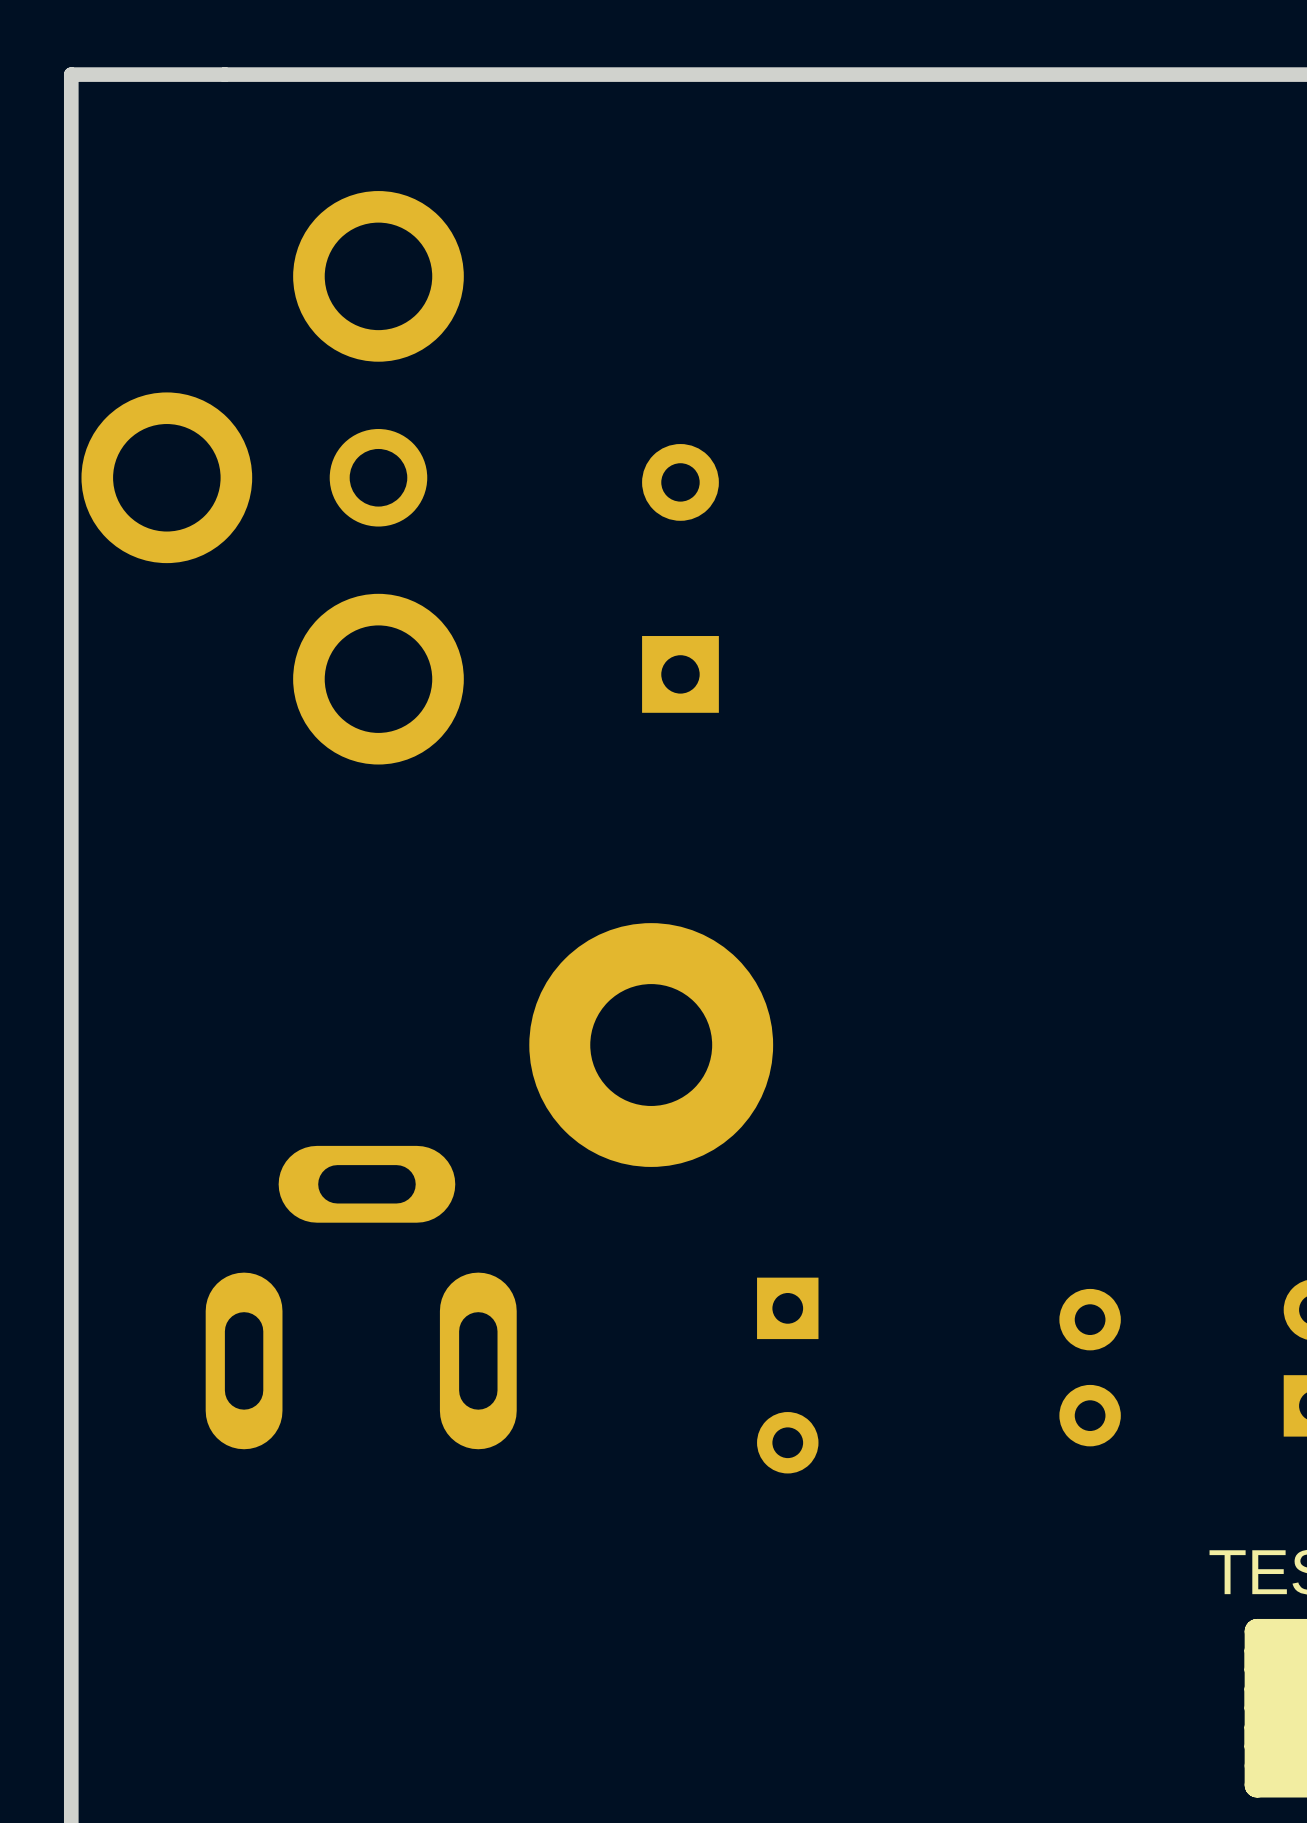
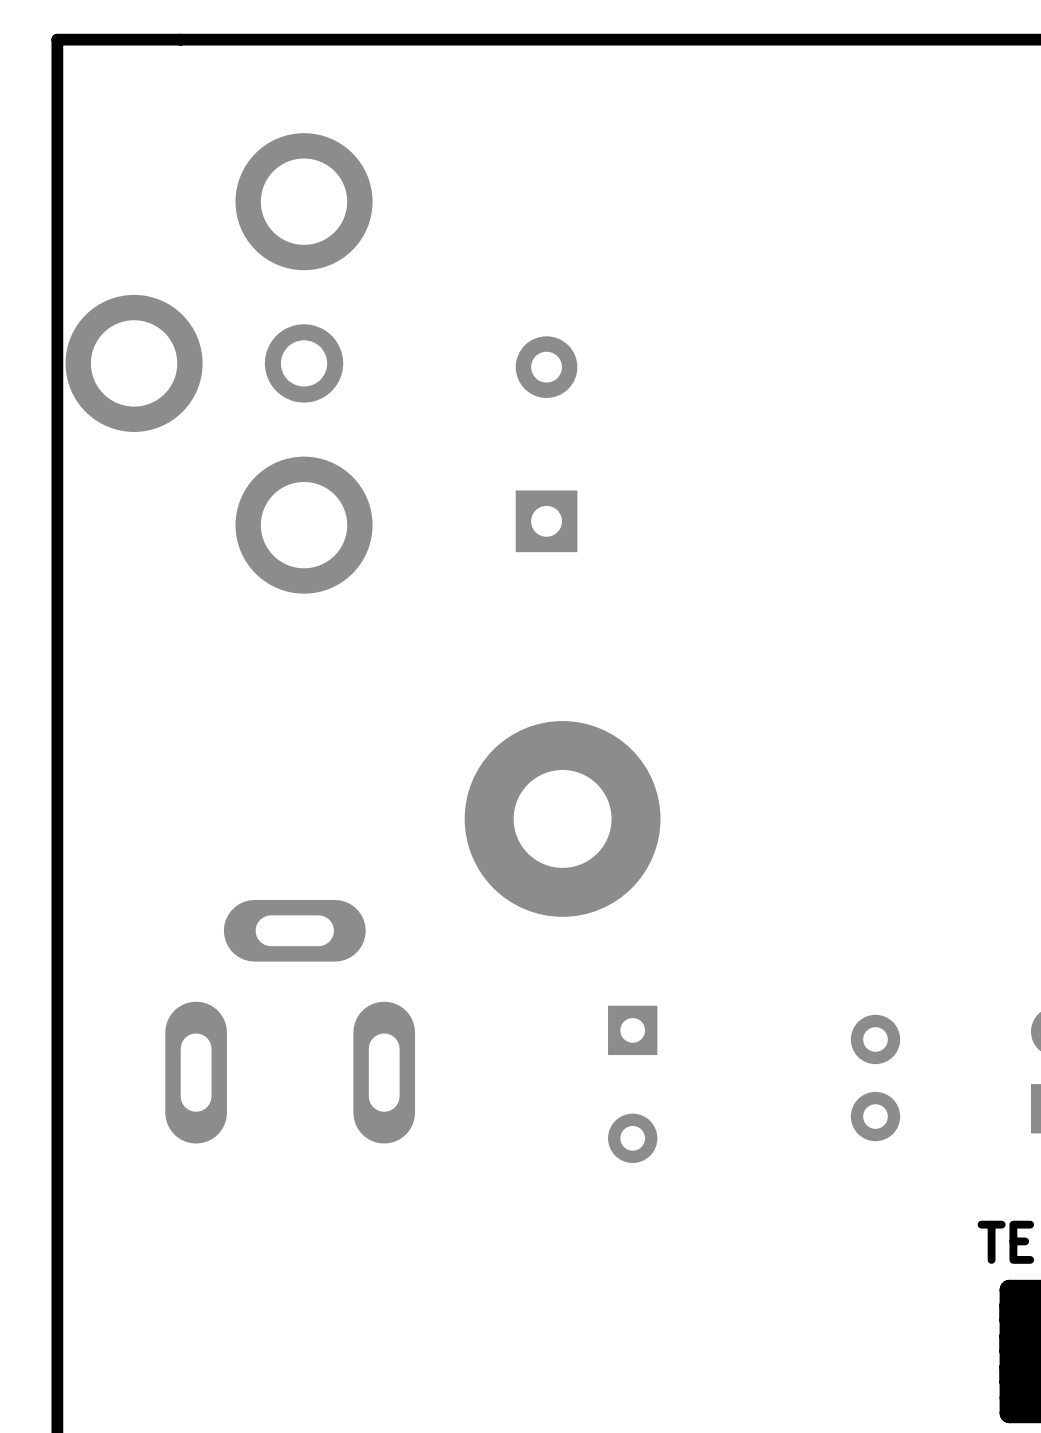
part position: (651, 1045) -> (562, 818)

